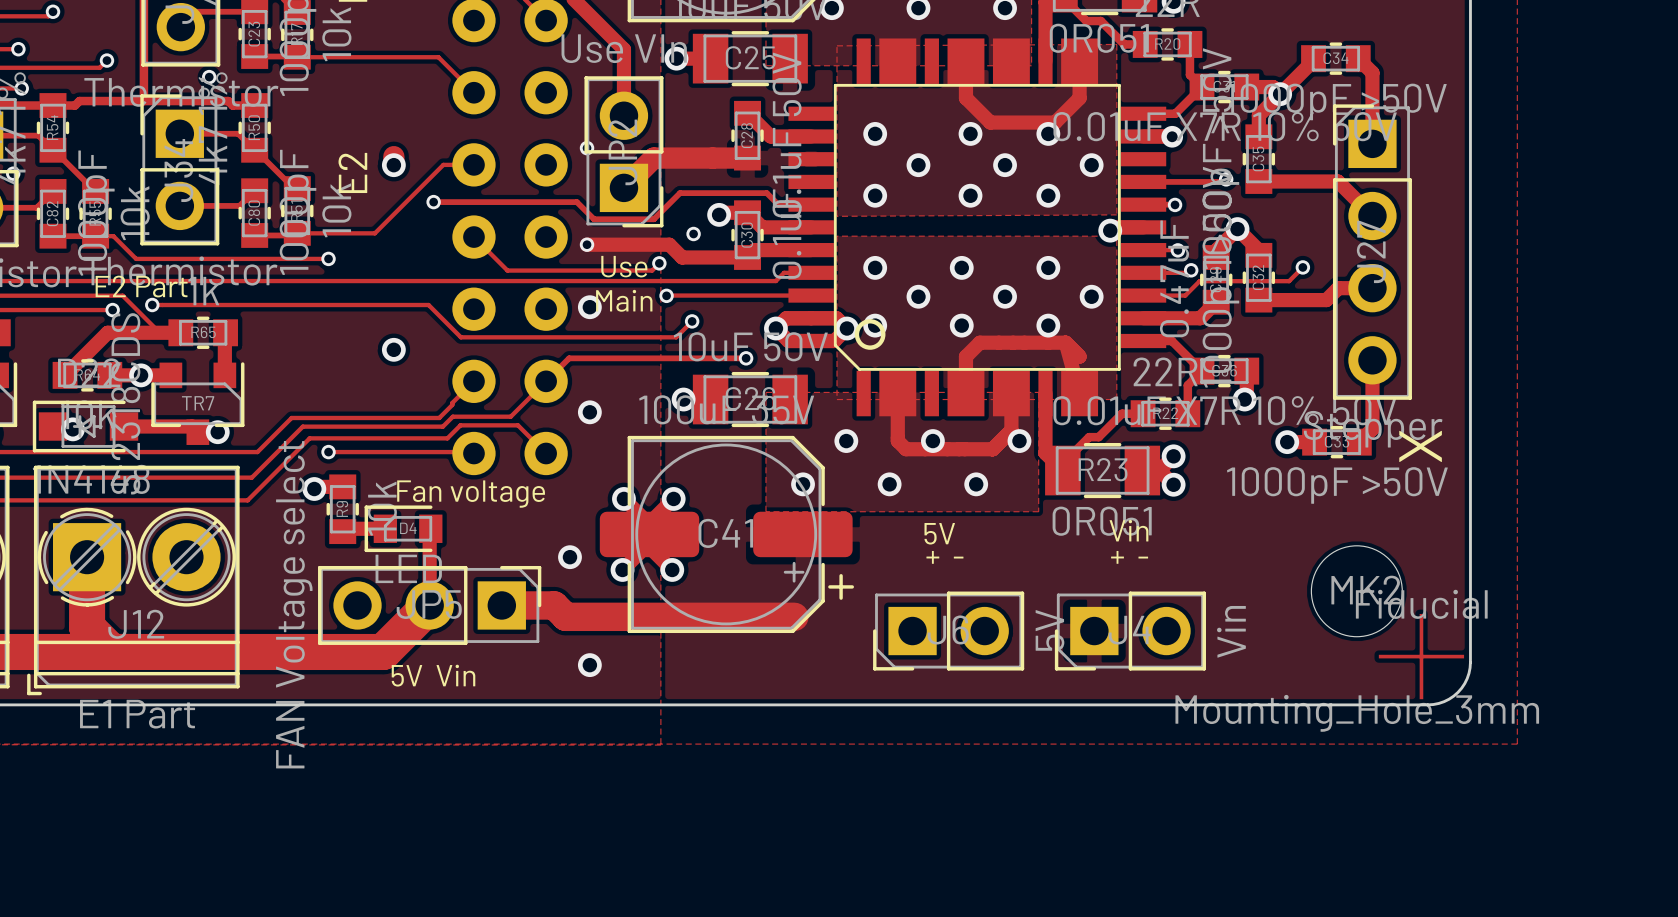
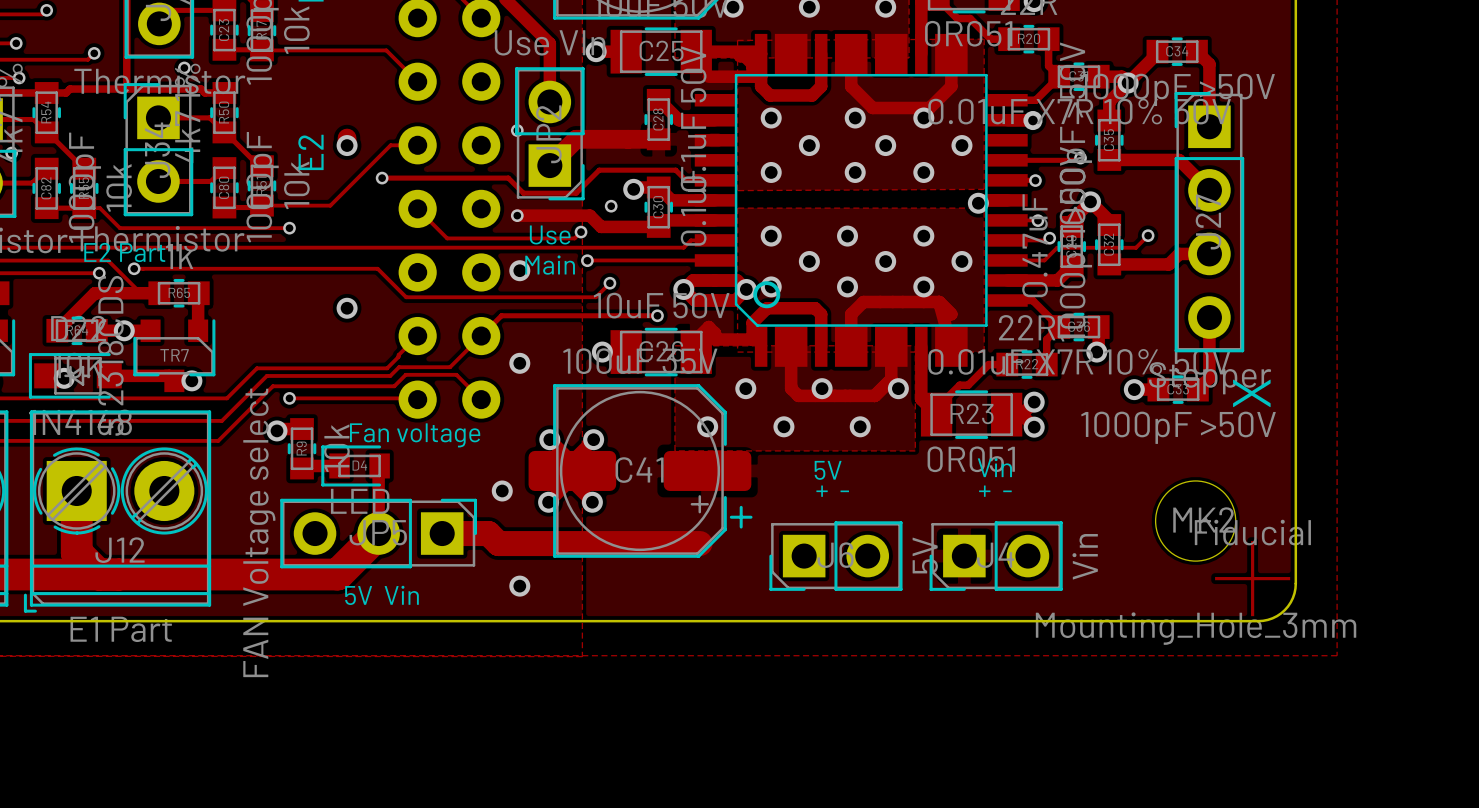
track: none -> (696, 51) (758, 51) (761, 53) (742, 53) (740, 56) (744, 56) (761, 76)
track: none -> (821, 53) (821, 86) (812, 95) (770, 95) (761, 86) (761, 76)
track: none -> (708, 76) (761, 76)
track: none -> (696, 339) (708, 327) (715, 333) (715, 339) (752, 339) (752, 322) (767, 308) (815, 308) (821, 314) (821, 346)

